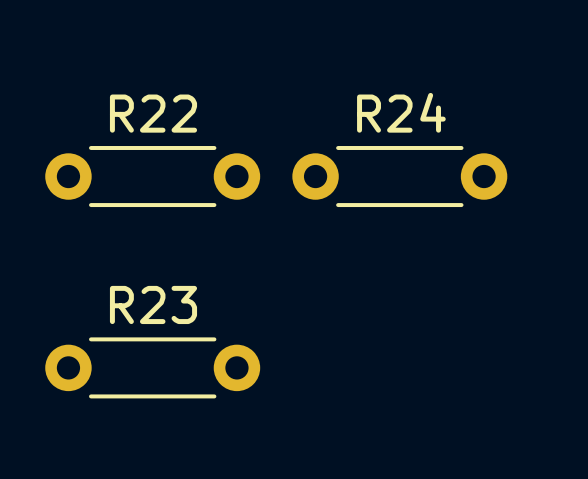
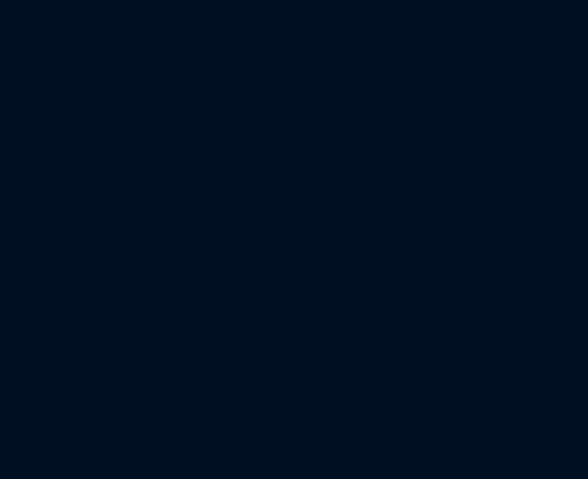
R22: (152, 176) -> none
R24: (399, 176) -> none
R23: (152, 367) -> none

